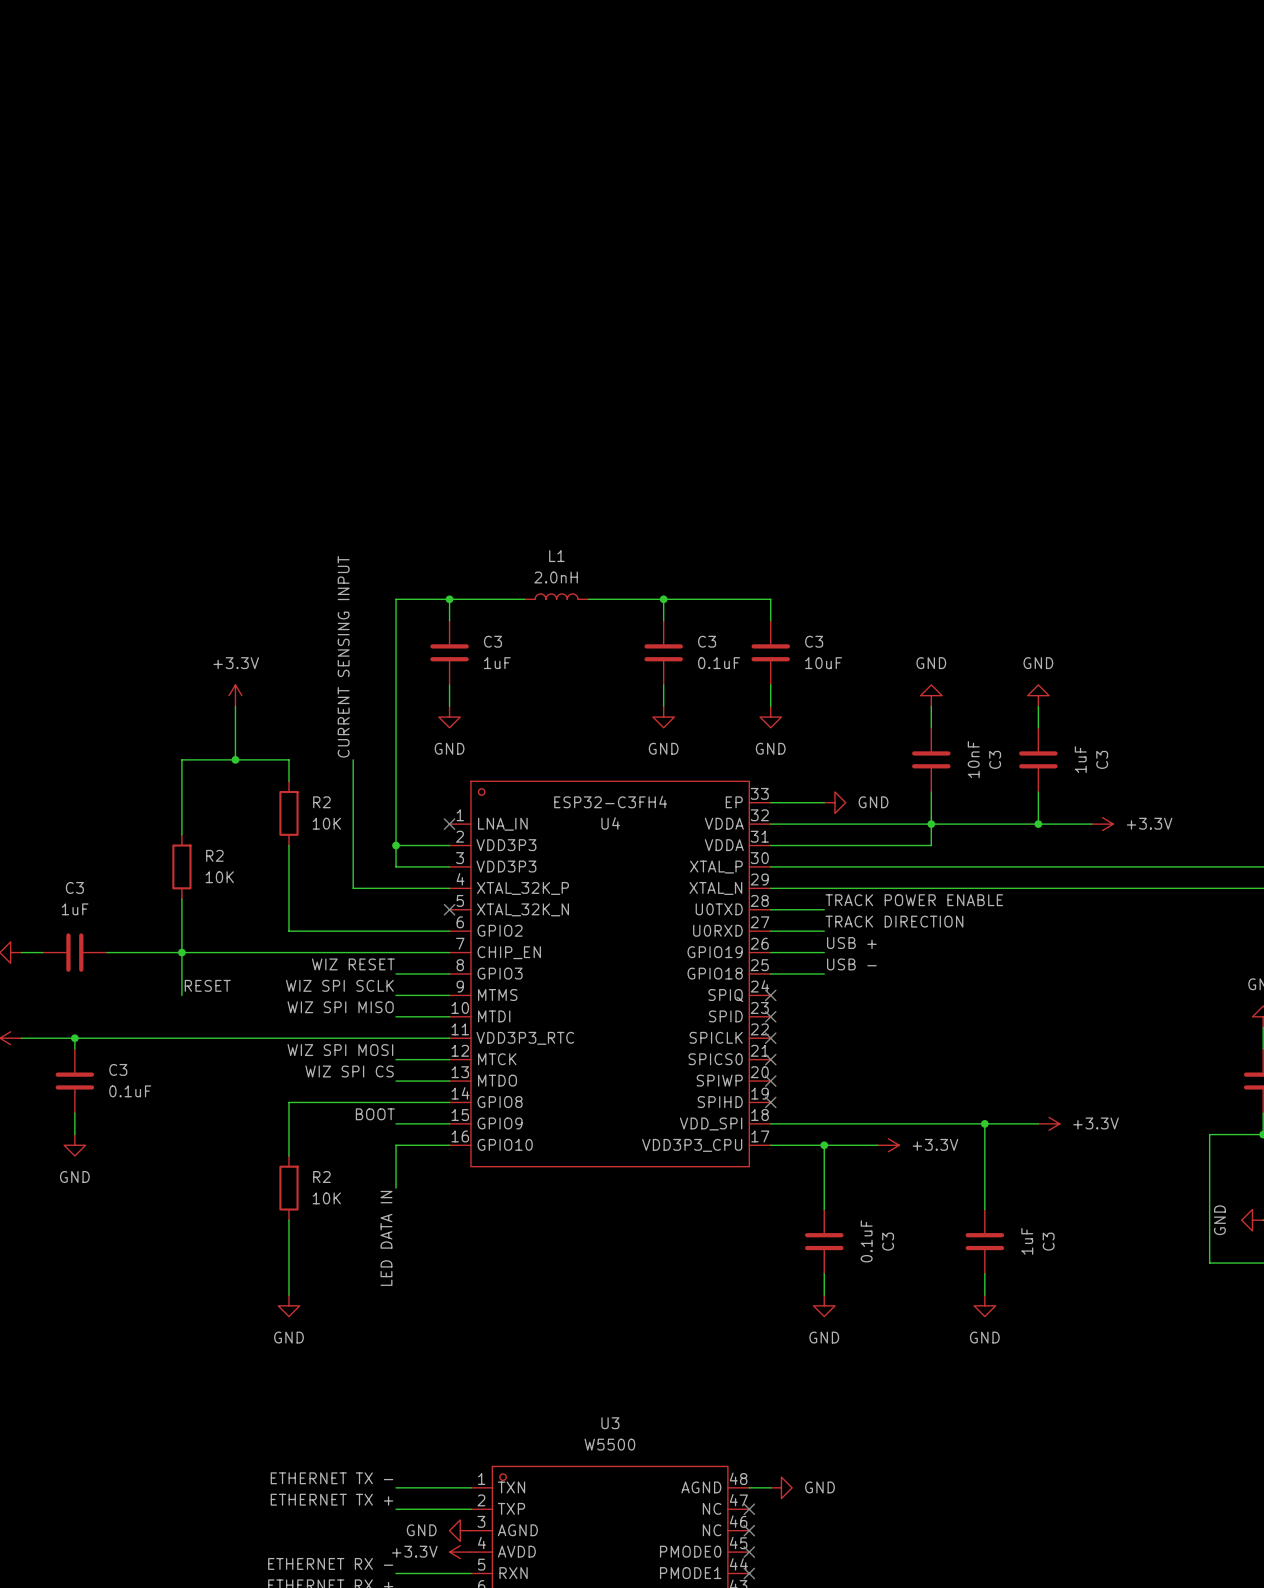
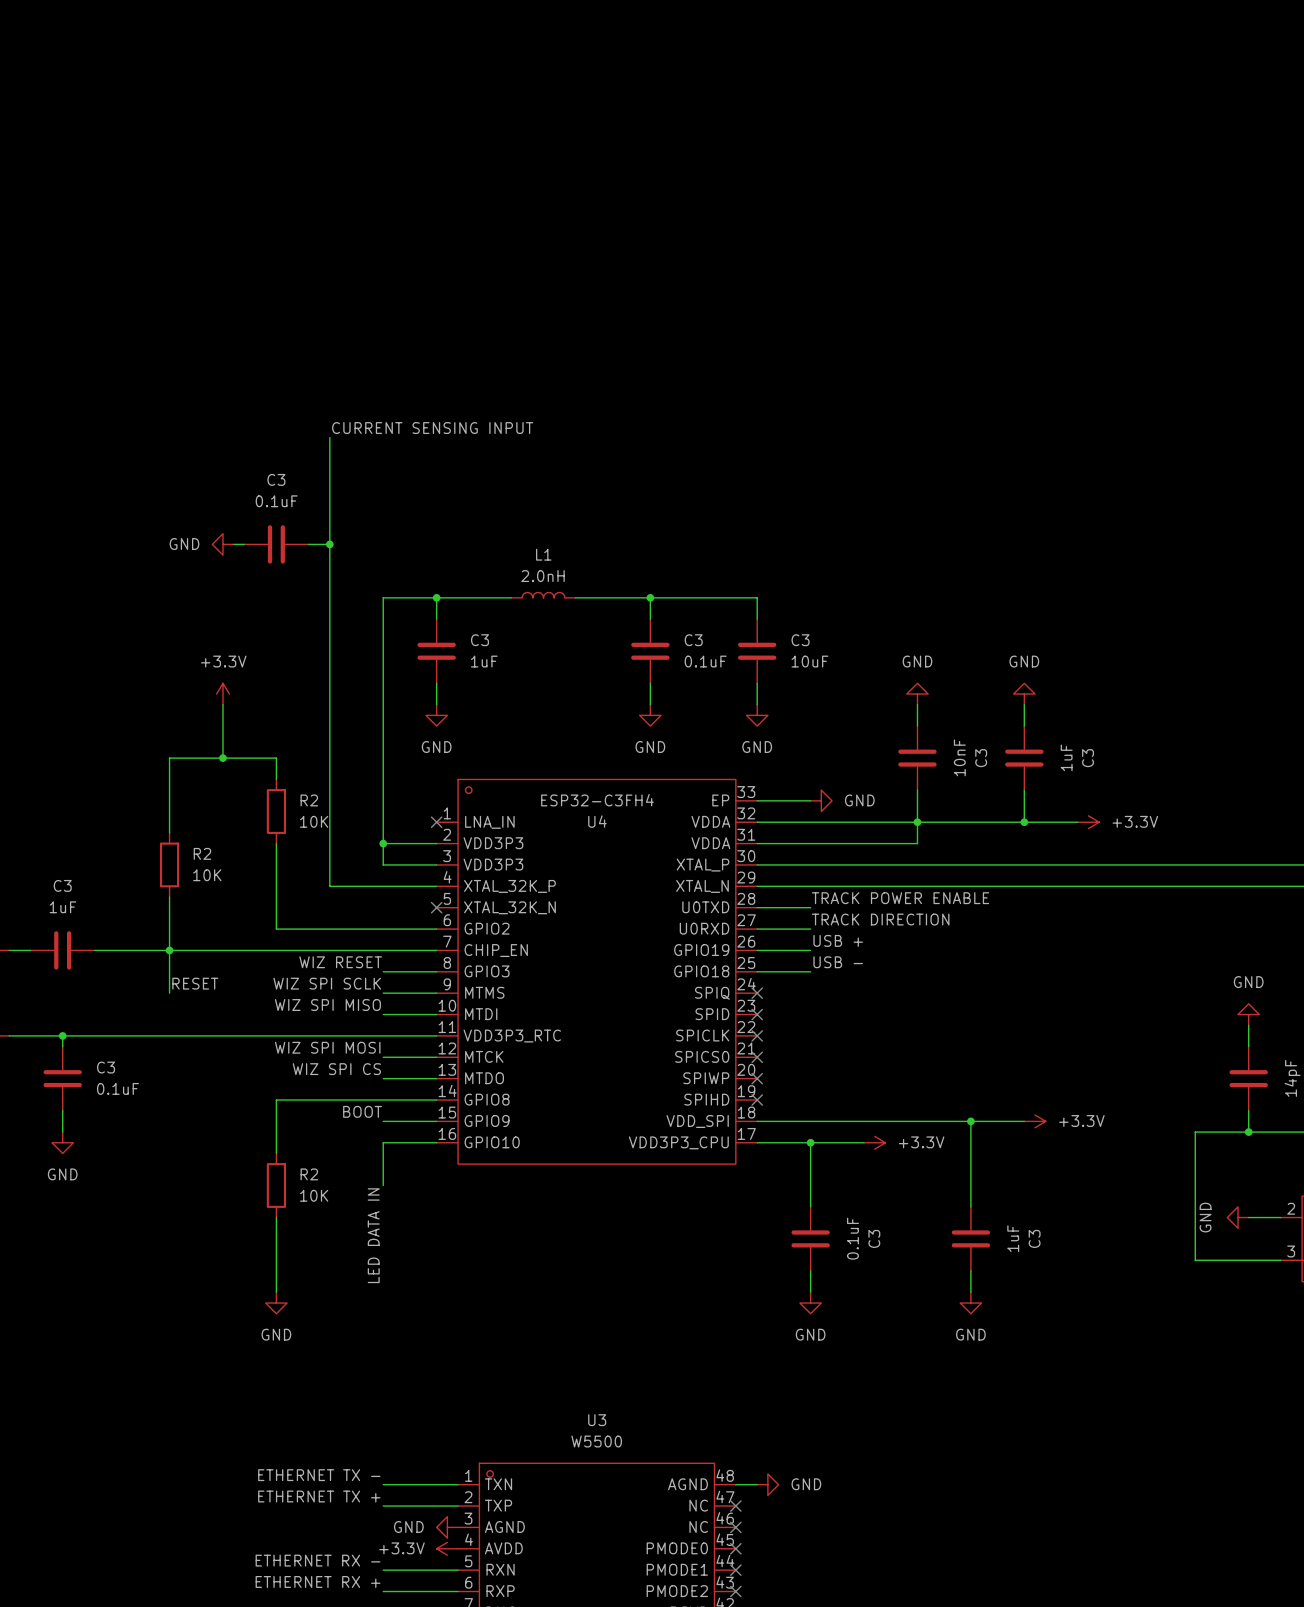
label: none -> CURRENT SENSING INPUT (432, 428)
power symbol: none -> GND (222, 544)
wire: none -> (233, 544) (244, 544)
C3: none -> 0.1uF (276, 544)
wire: none -> (308, 544) (329, 544)
junction: none -> (329, 544)
label: CURRENT SENSING INPUT (343, 656) -> none
wire: (353, 759) (353, 888) -> (329, 437) (329, 886) (340, 886)

